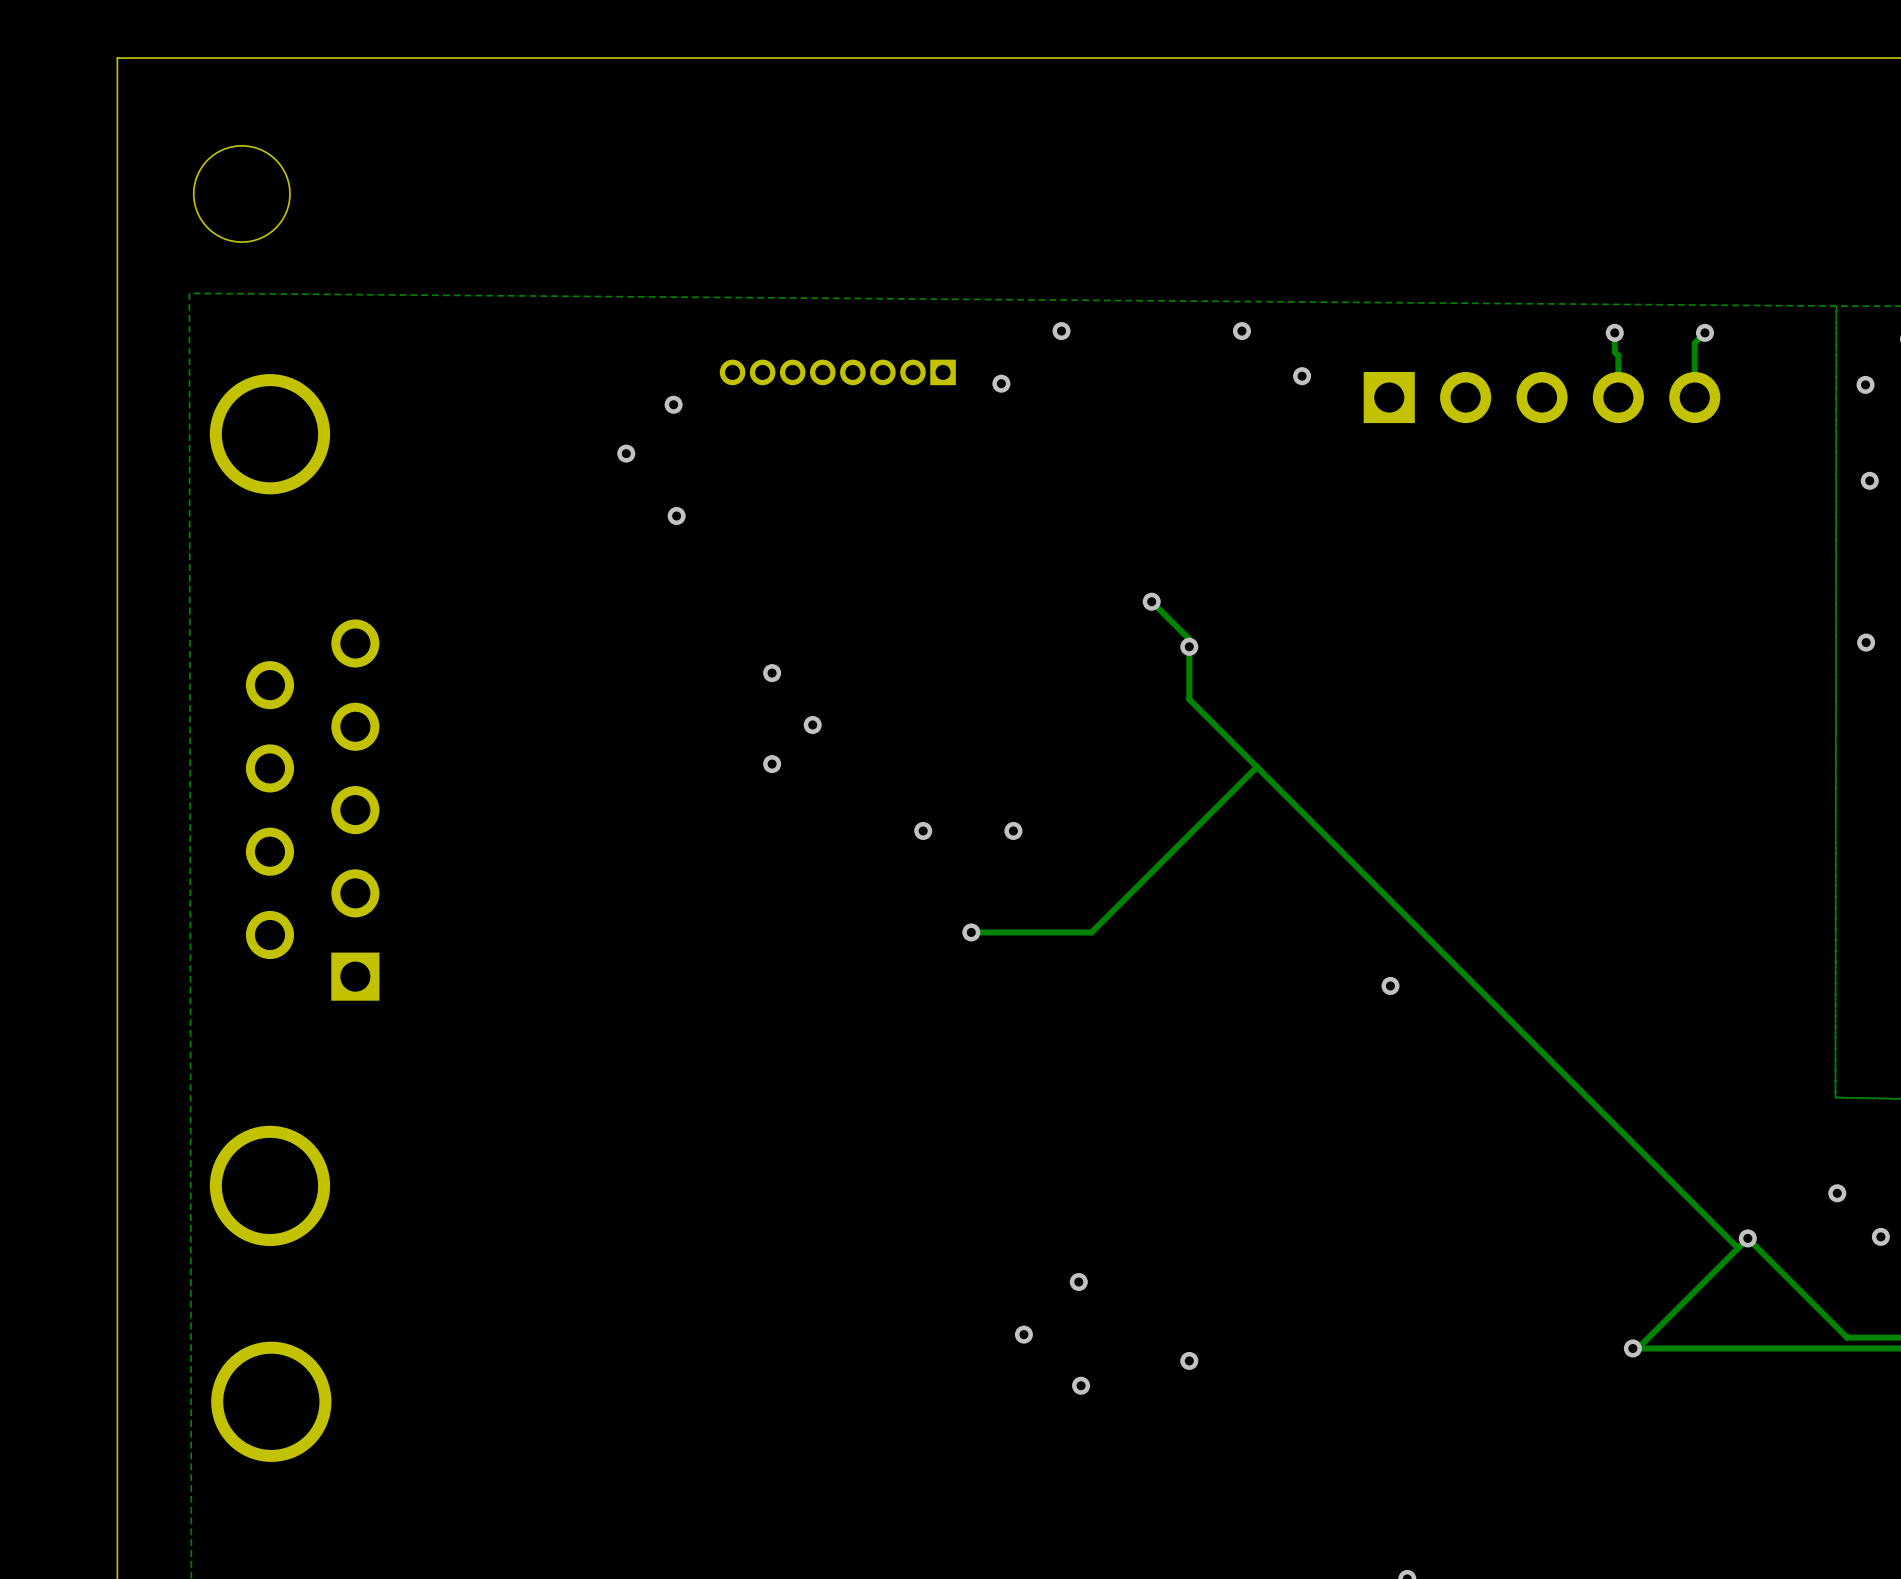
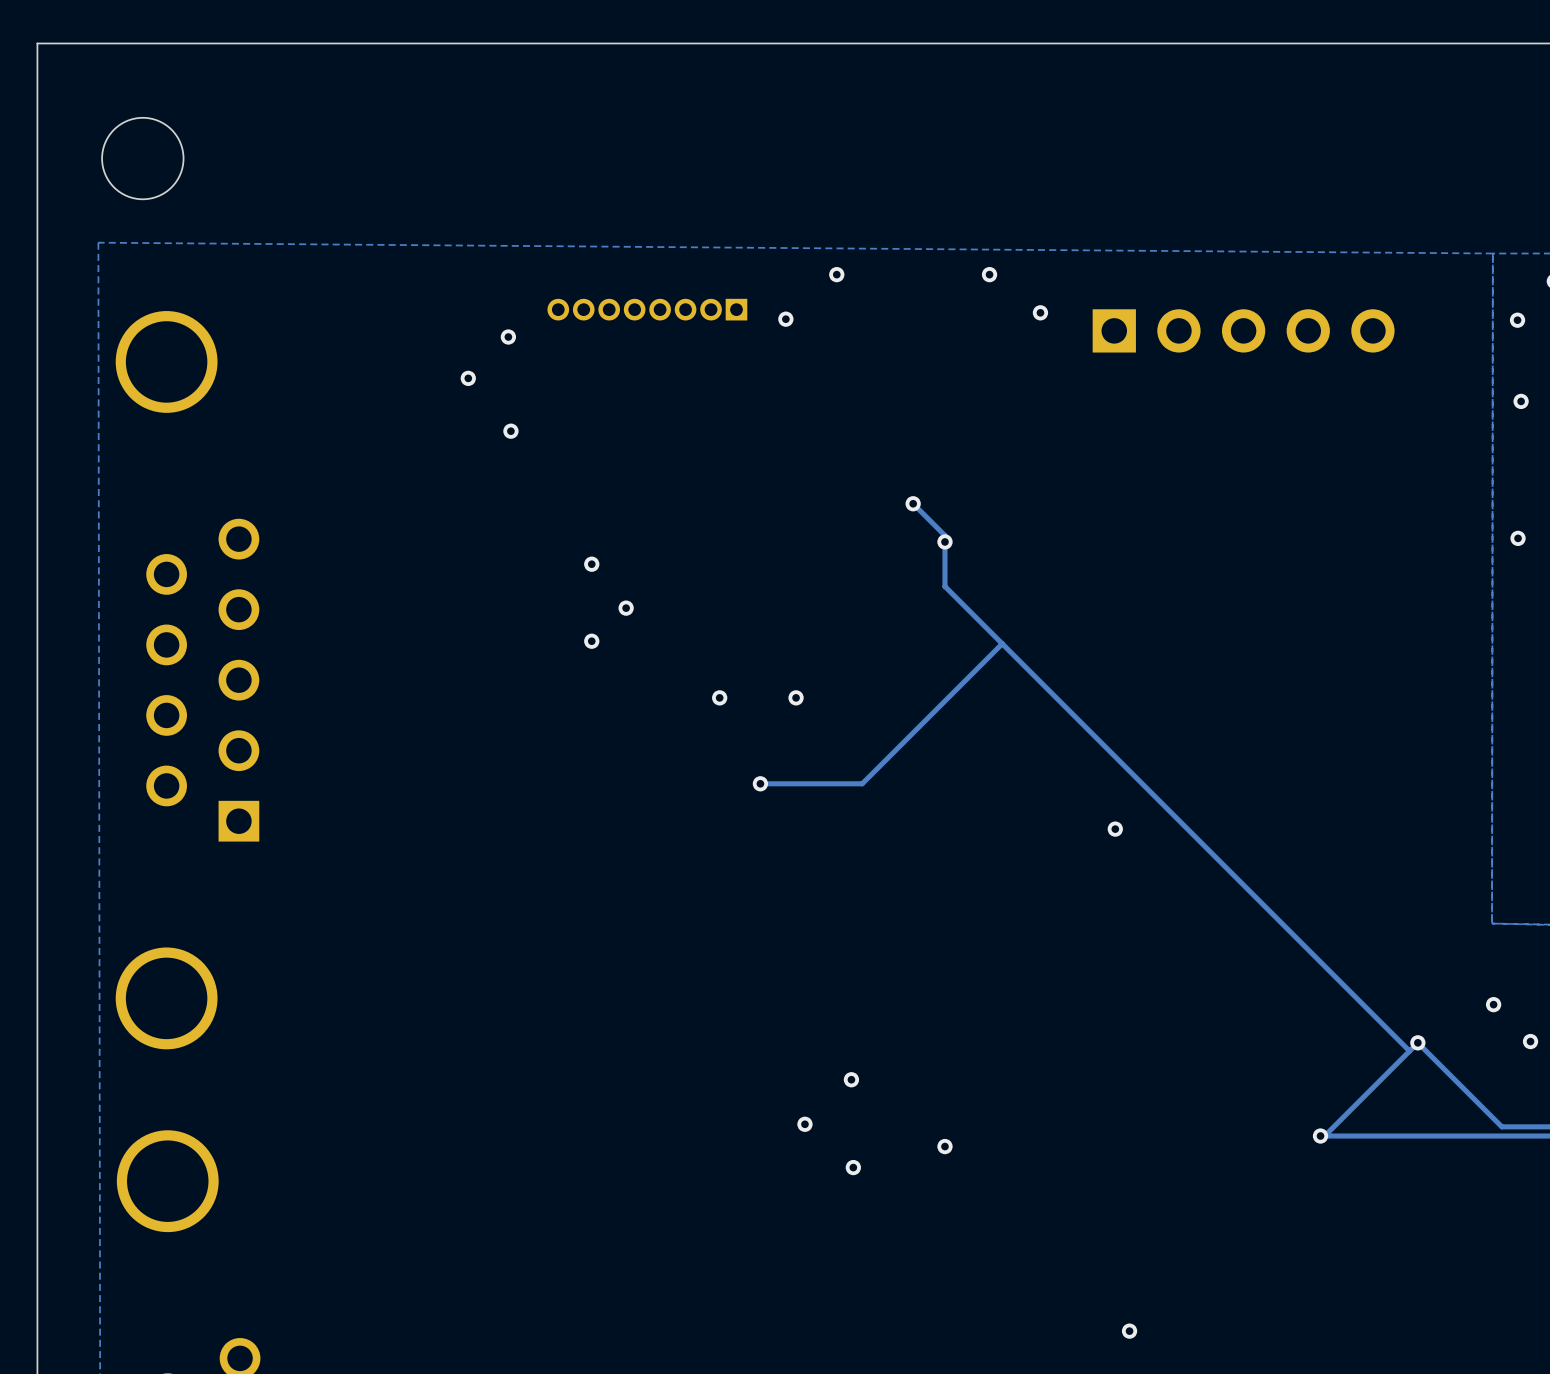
track: (1614, 332) (1614, 352) (1618, 355) (1618, 397) -> none
via: (1614, 332) -> none
track: (1704, 332) (1694, 343) (1694, 397) -> none
via: (1704, 332) -> none

